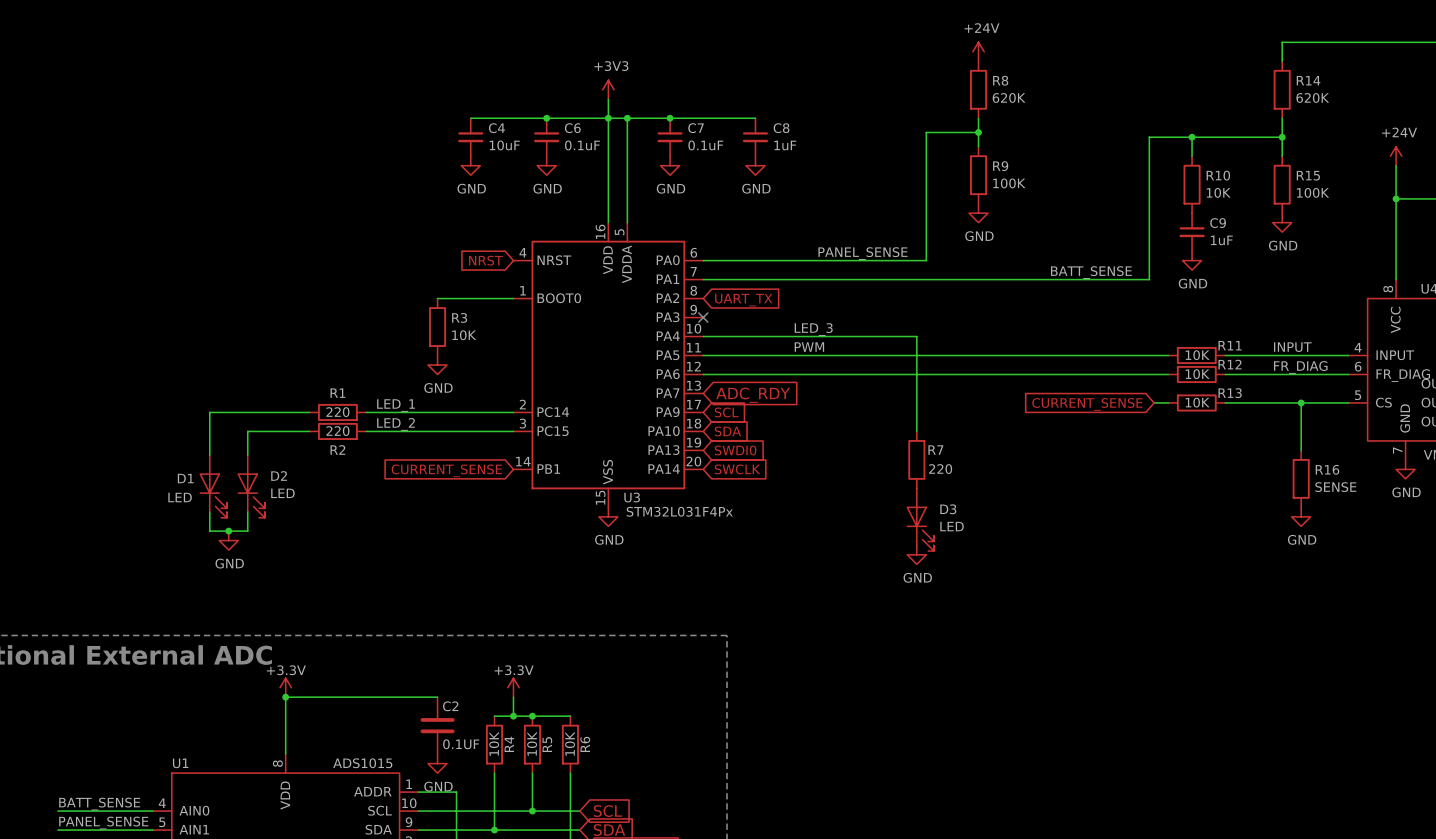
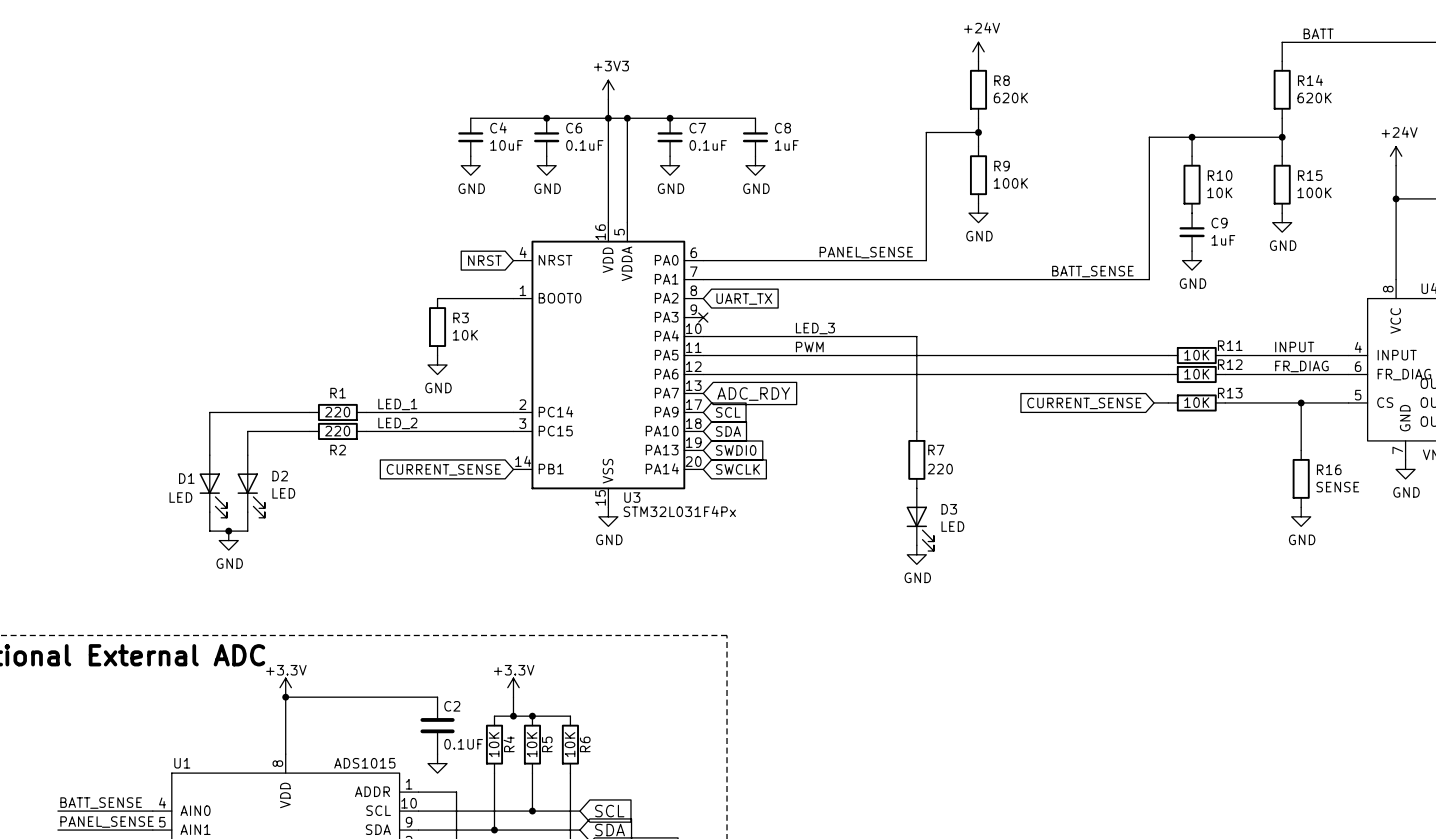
label: none -> BATT (1318, 33)
power symbol text: GND (438, 786) -> none

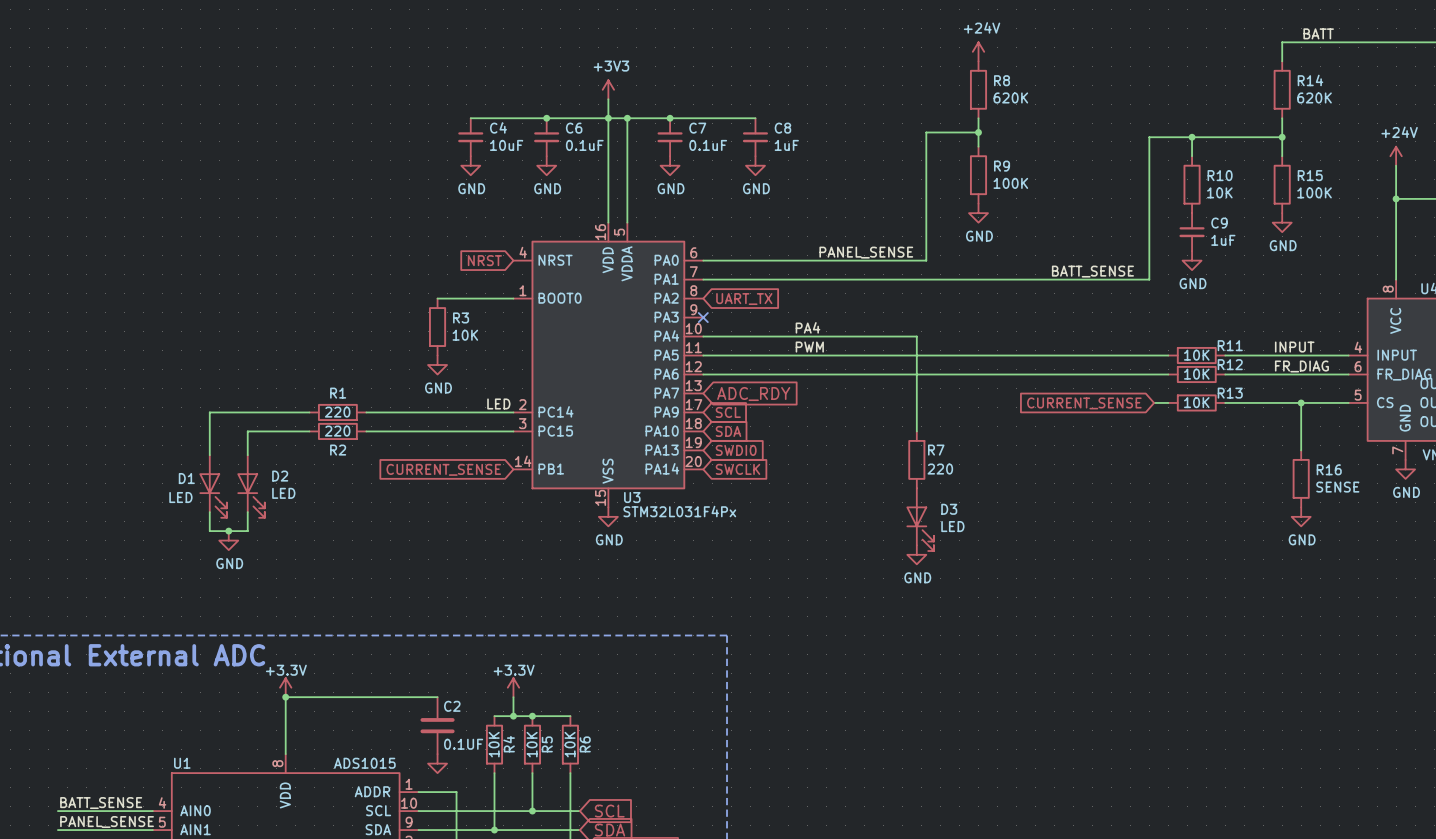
label: LED_3 (815, 328) -> PA4 (807, 327)
label: none -> LED (498, 403)
label: LED_1 (397, 404) -> none
label: LED_2 (397, 423) -> none

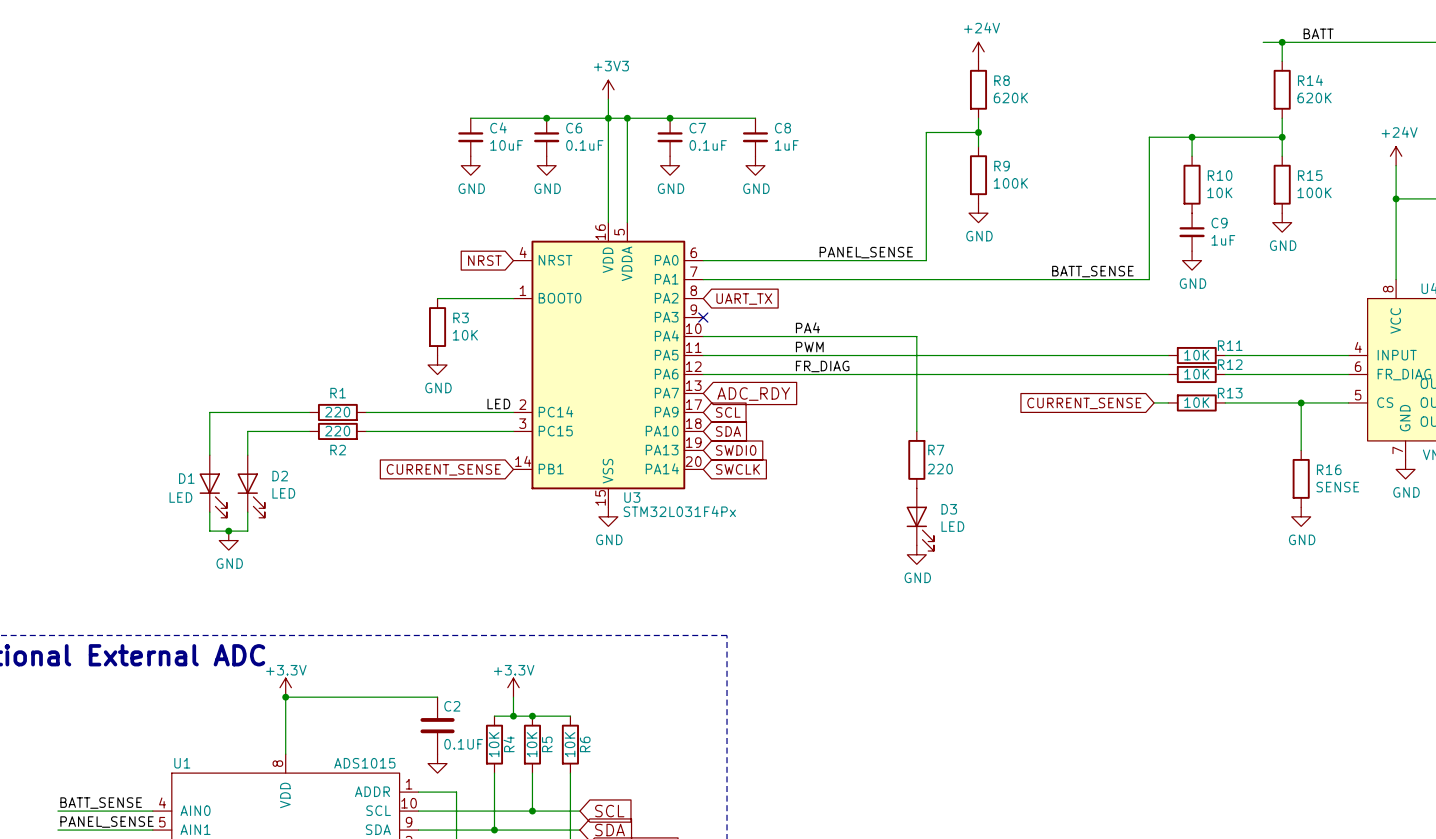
wire: none -> (1263, 42) (1282, 42)
junction: none -> (1282, 42)
label: INPUT (1294, 347) -> none
label: none -> FR_DIAG (822, 366)
label: FR_DIAG (1301, 366) -> none

